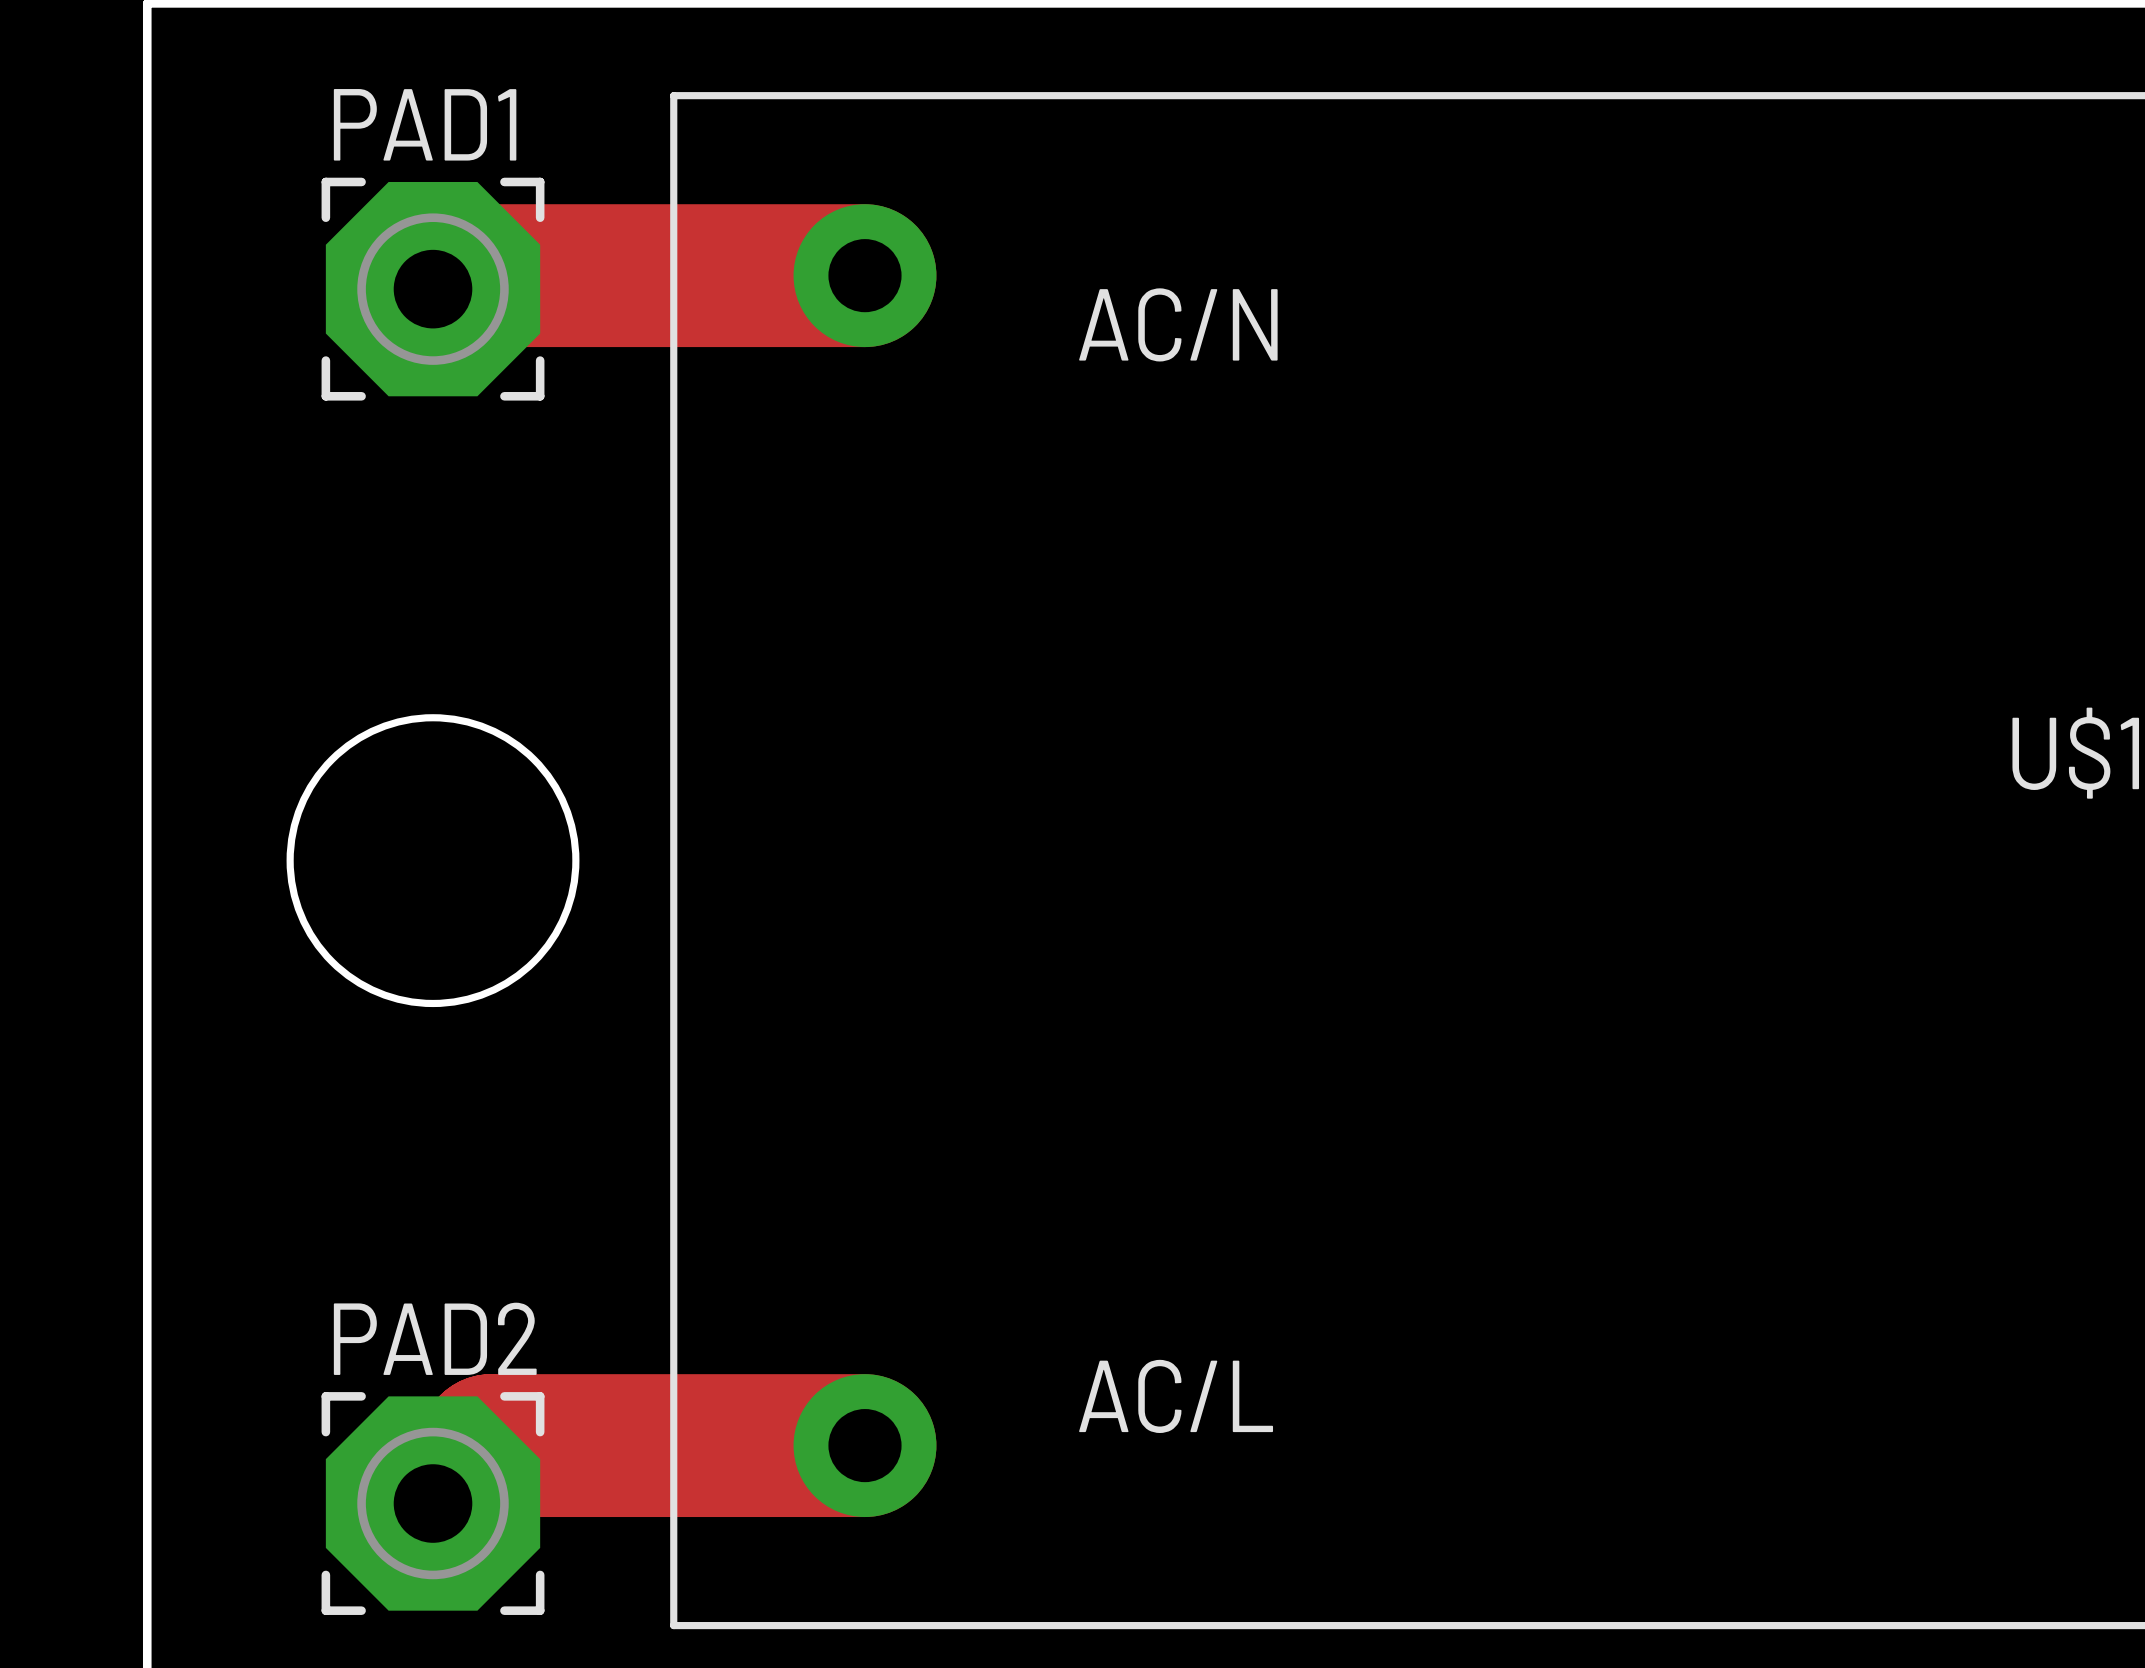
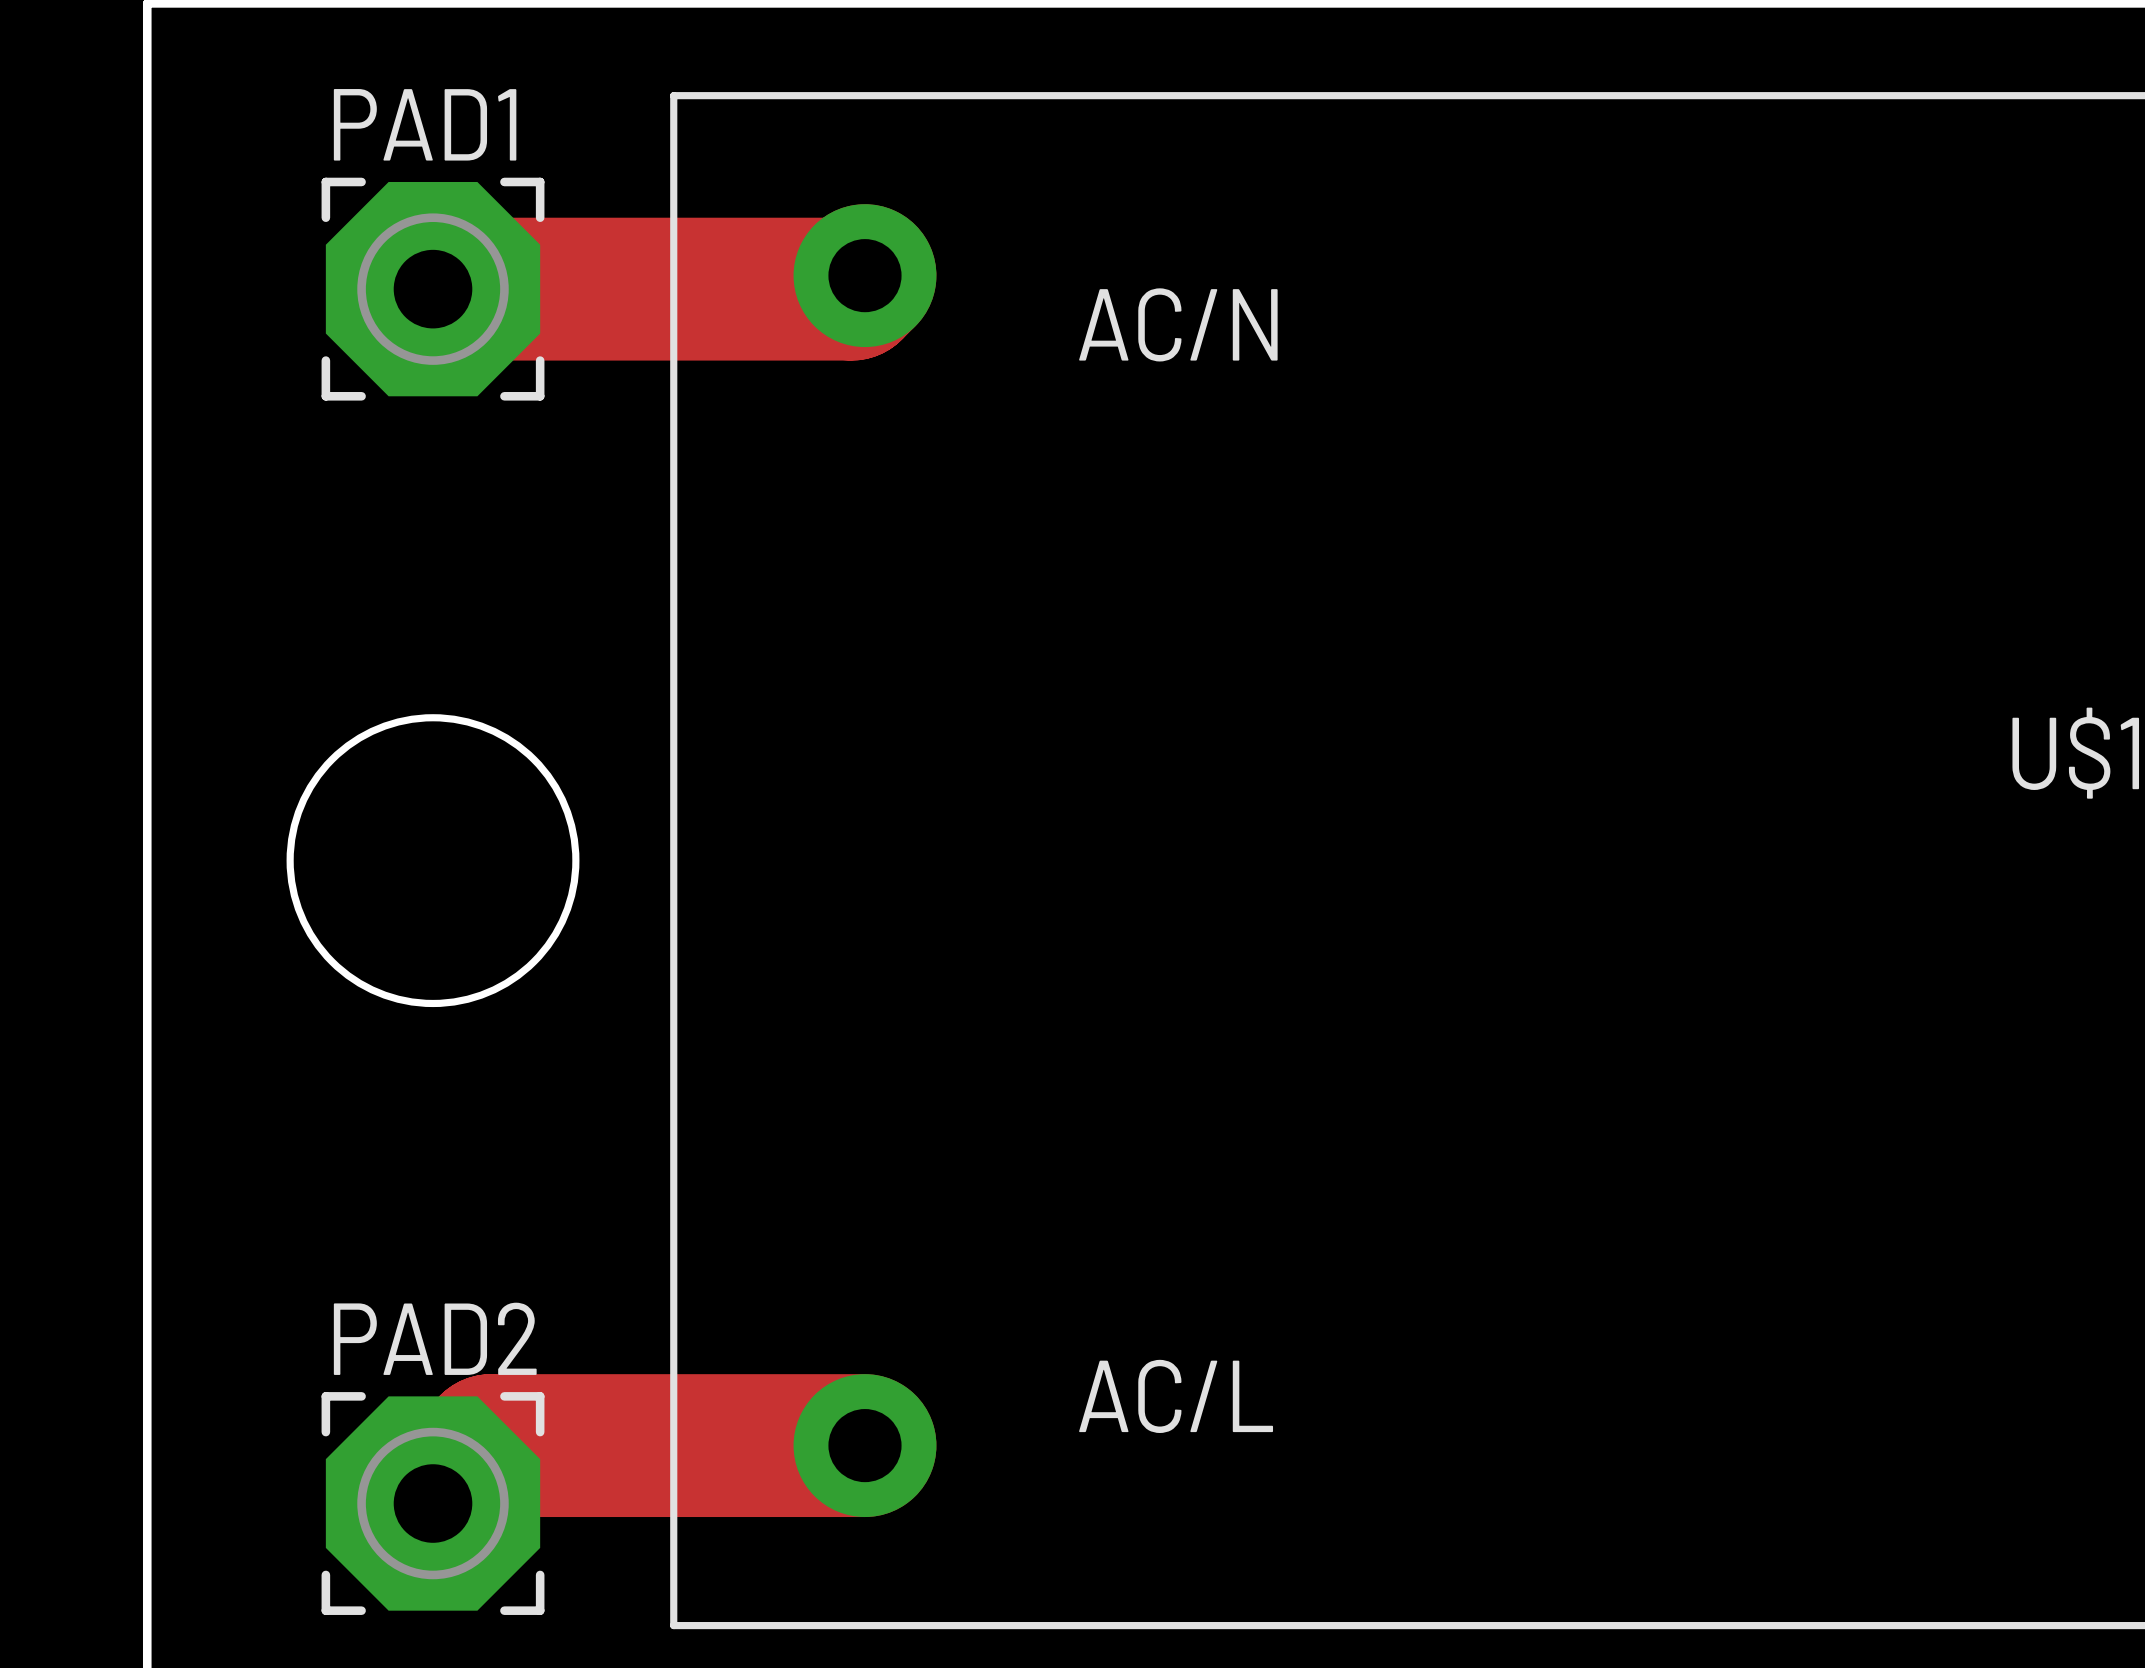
track: (864, 275) (446, 275) (433, 289) -> (864, 275) (851, 289) (433, 289)

